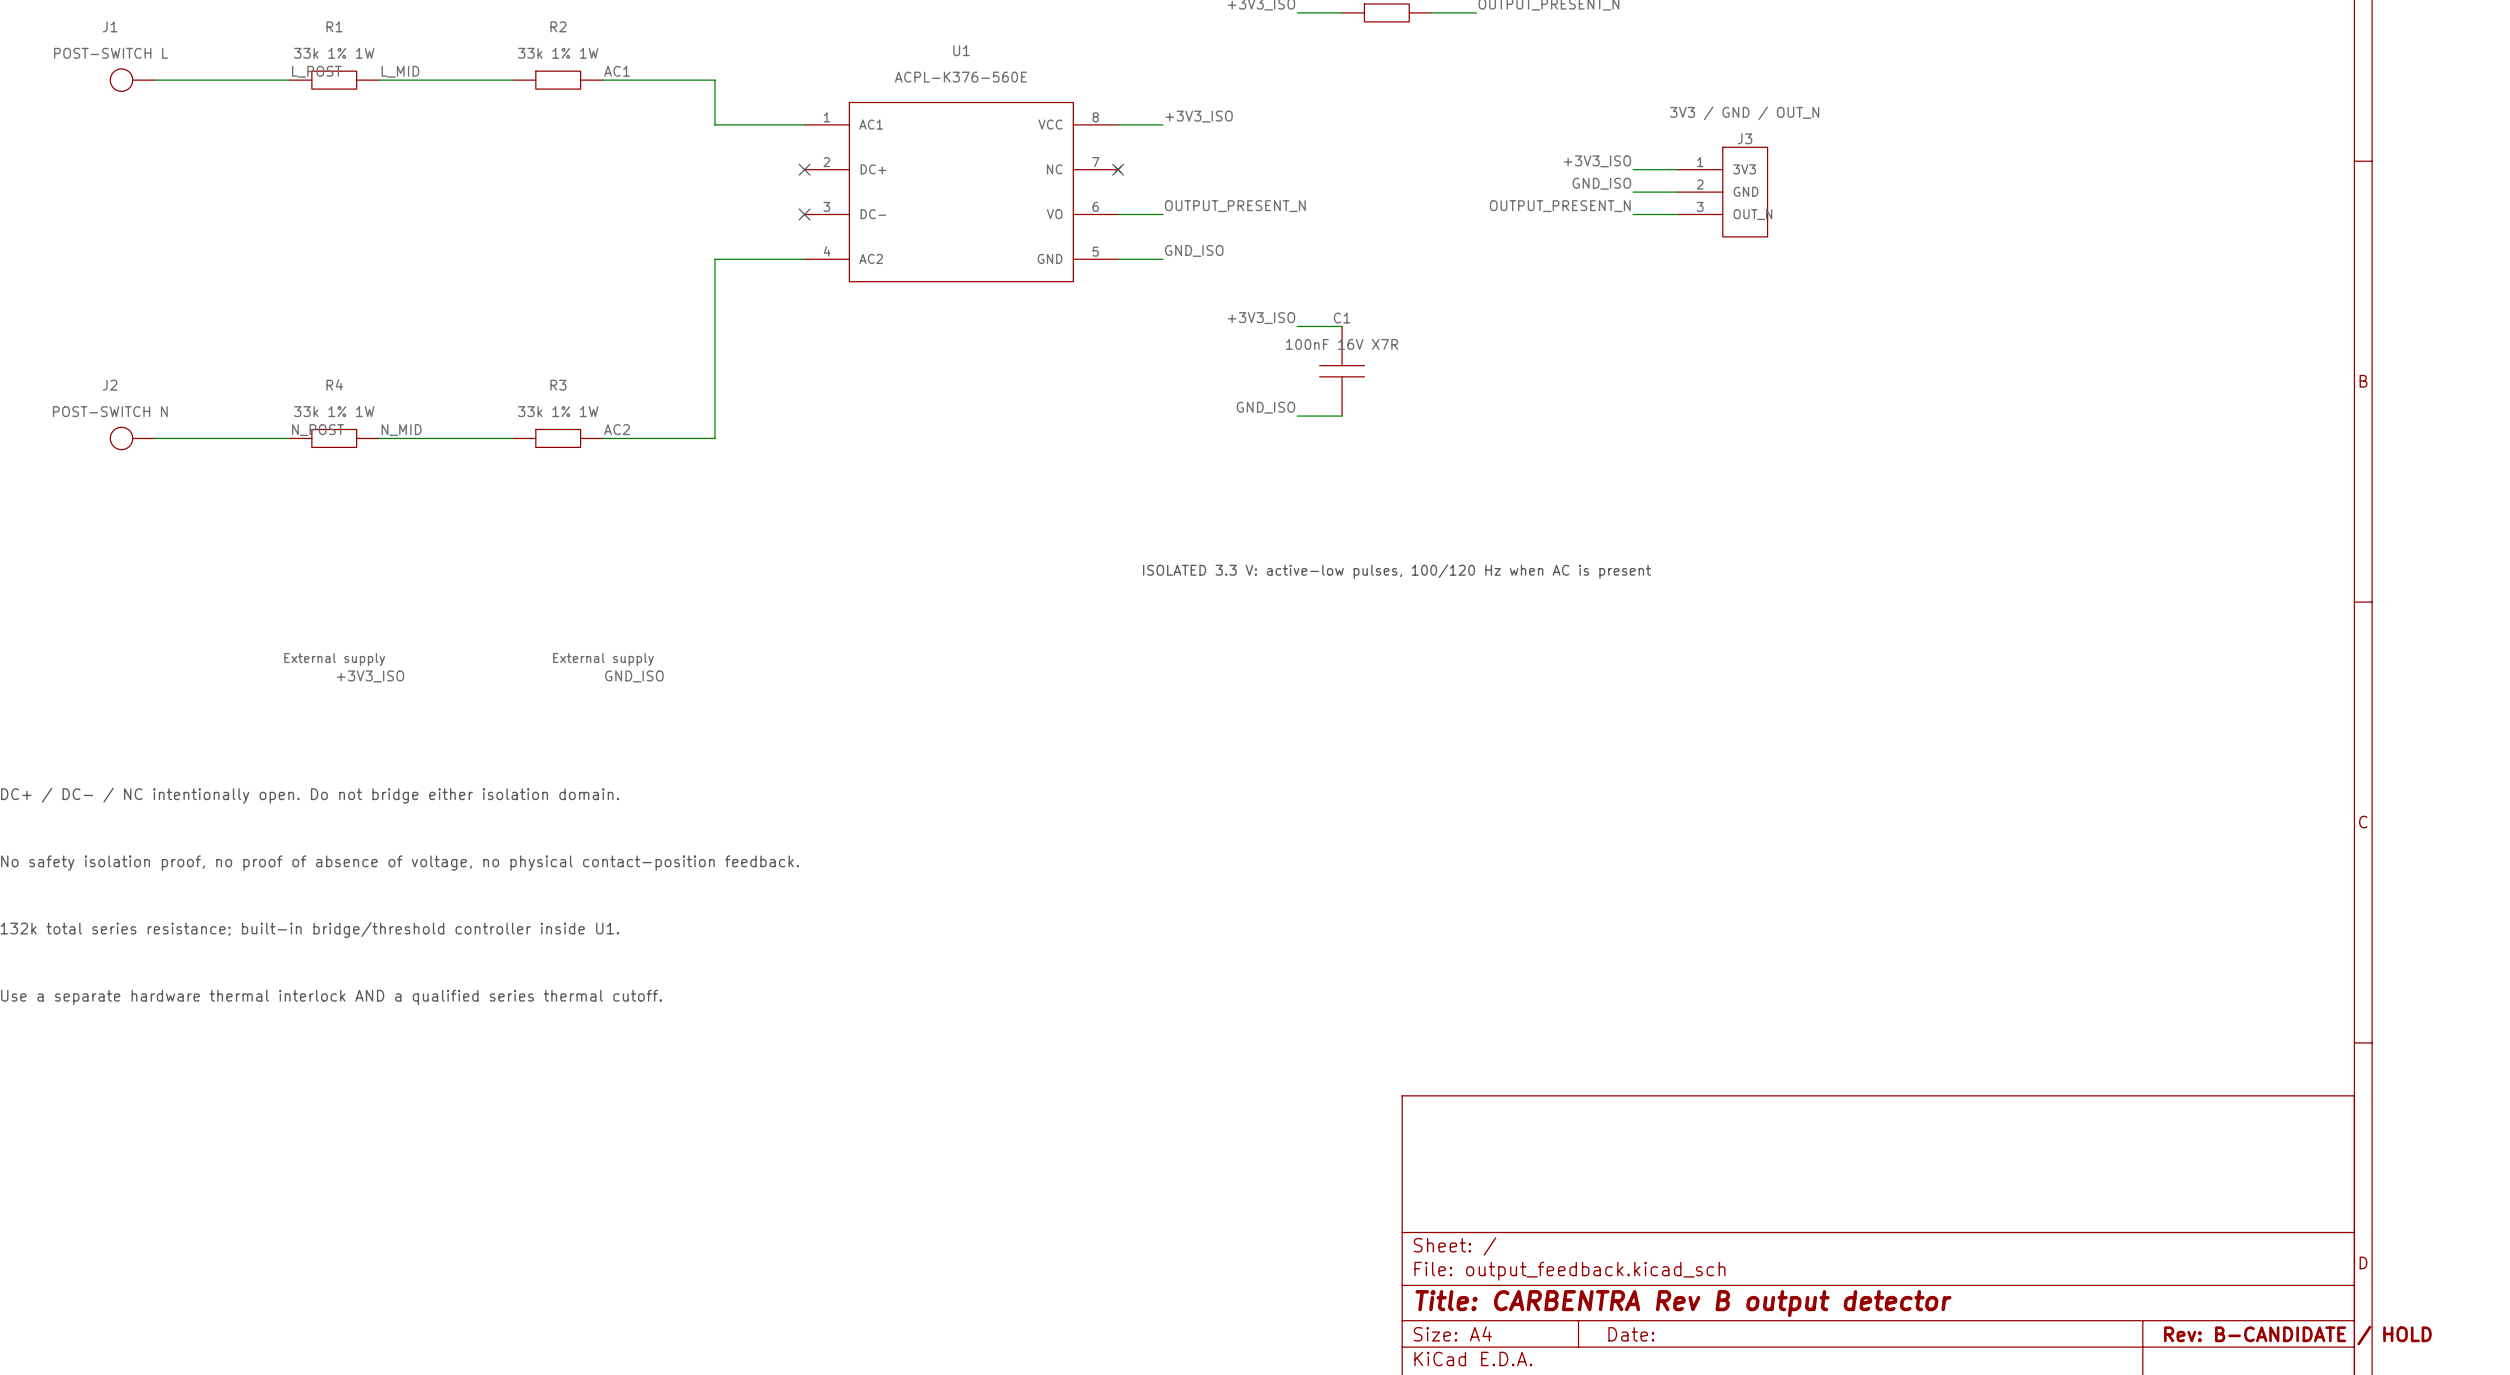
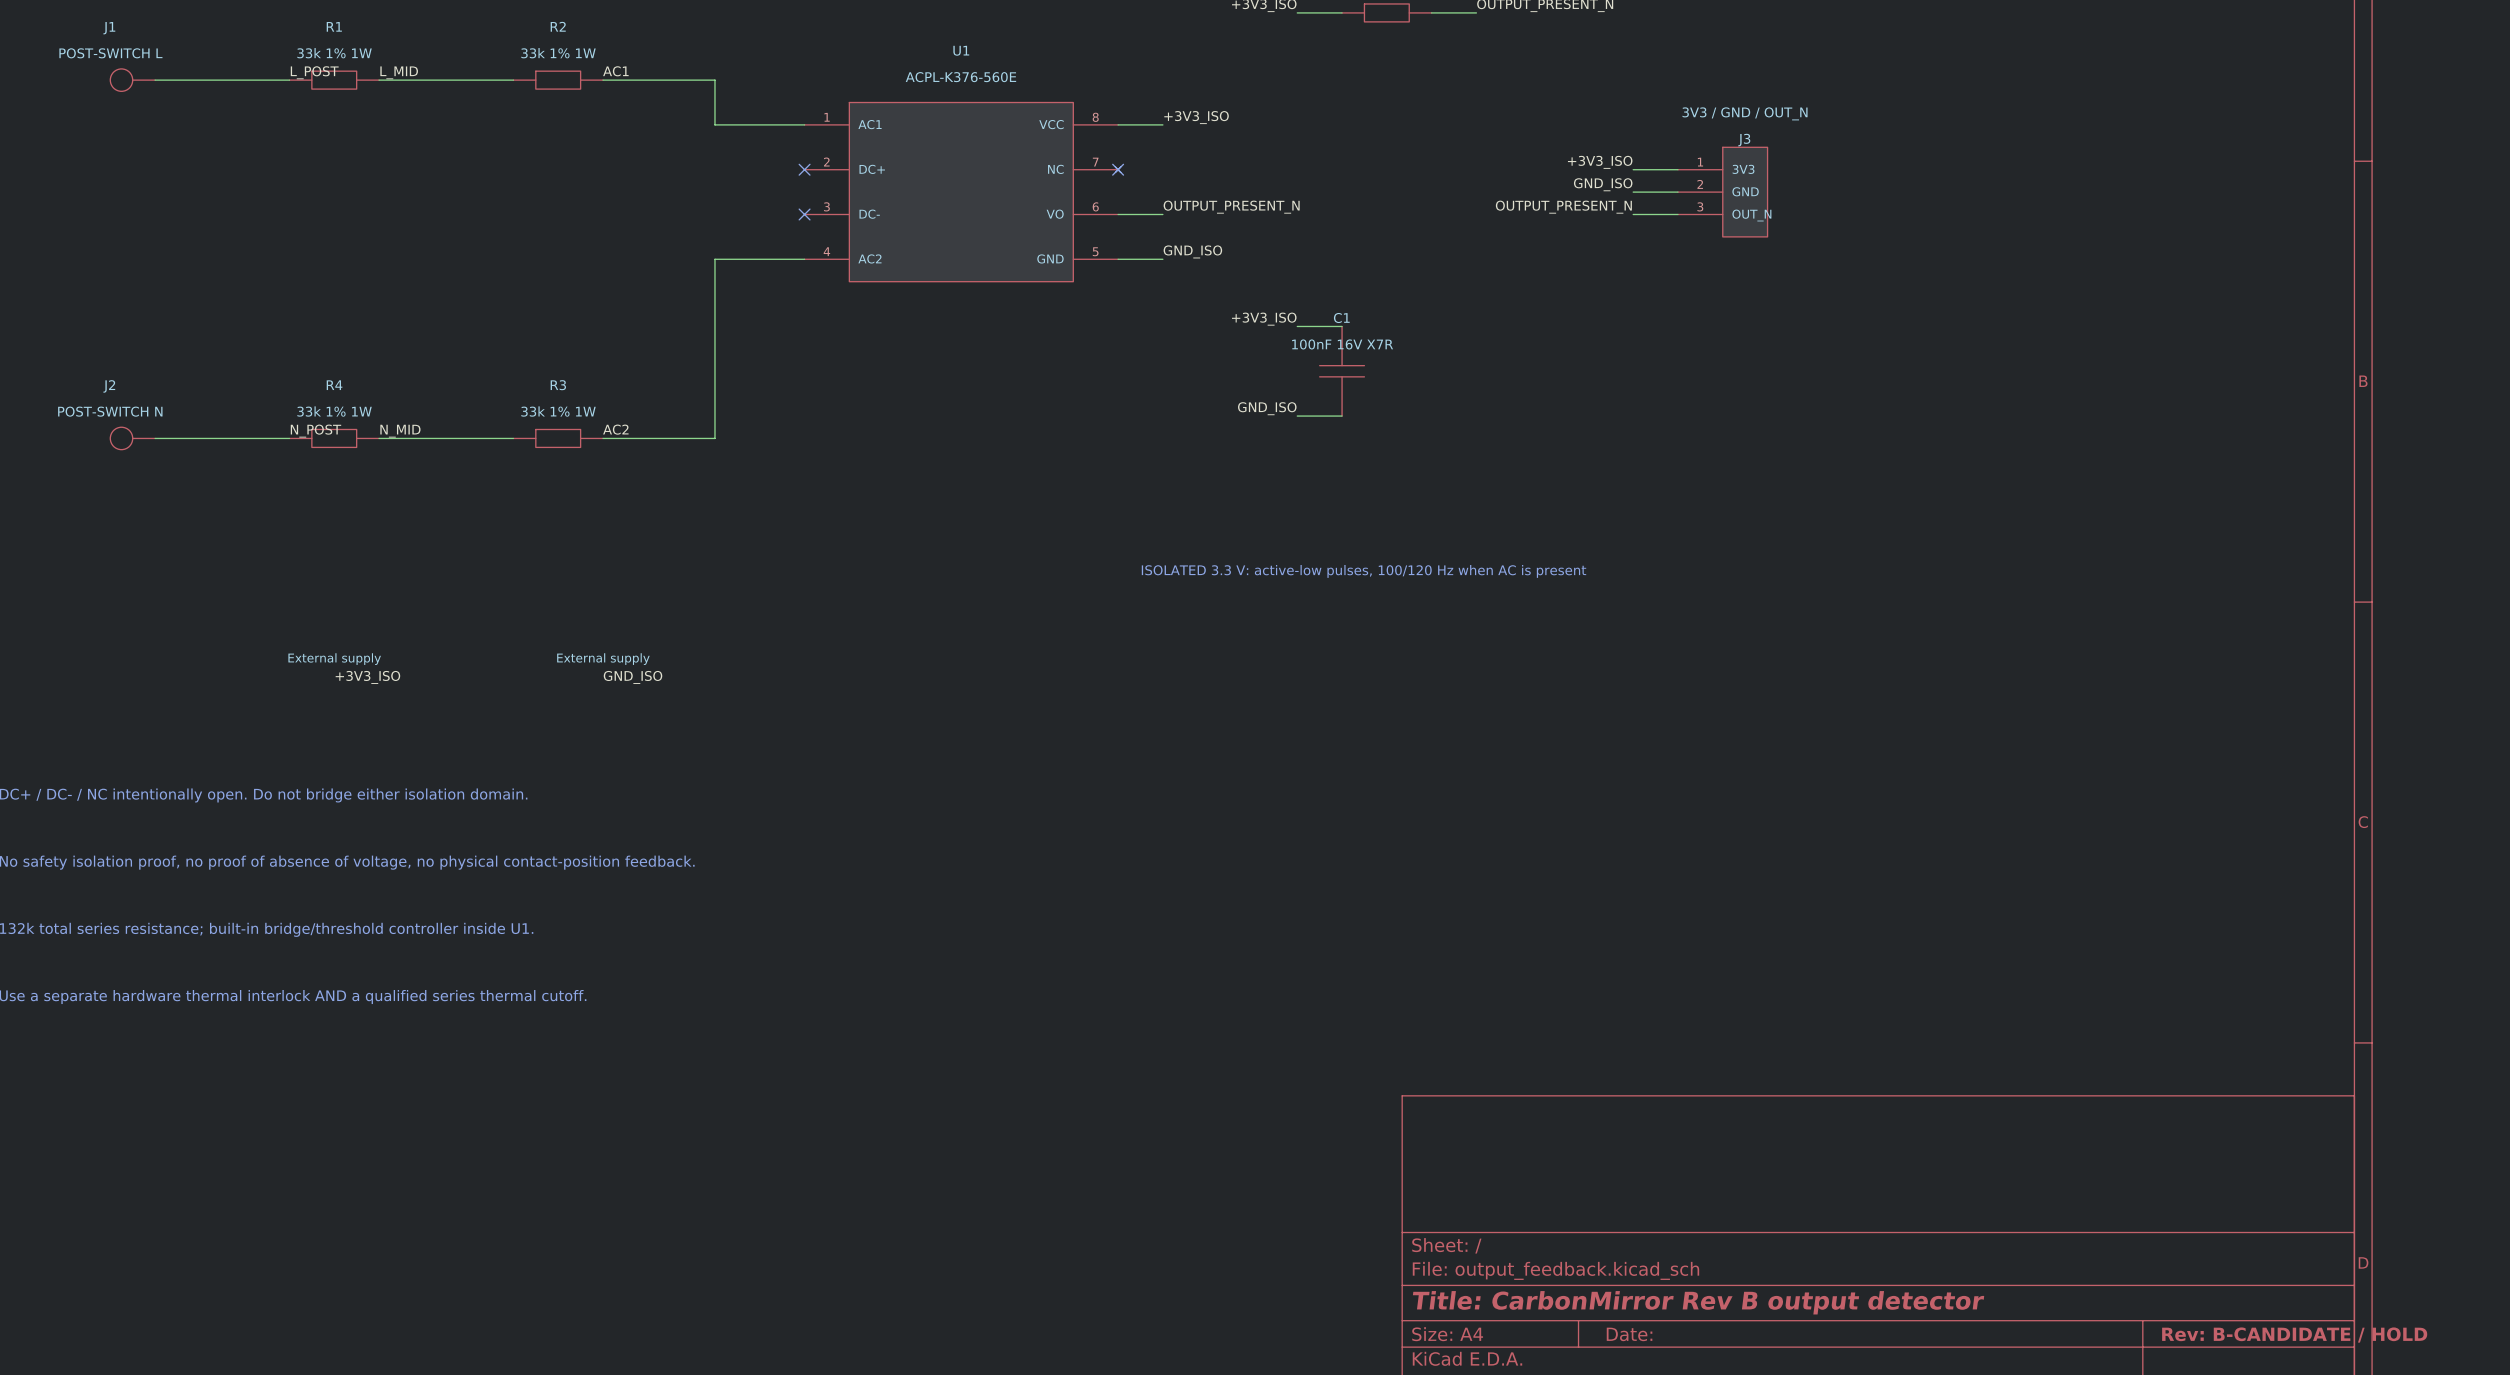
title block: Title: CARBENTRA Rev B output detector (1683, 1303) -> Title: CarbonMirror Rev B output detector (1698, 1302)

